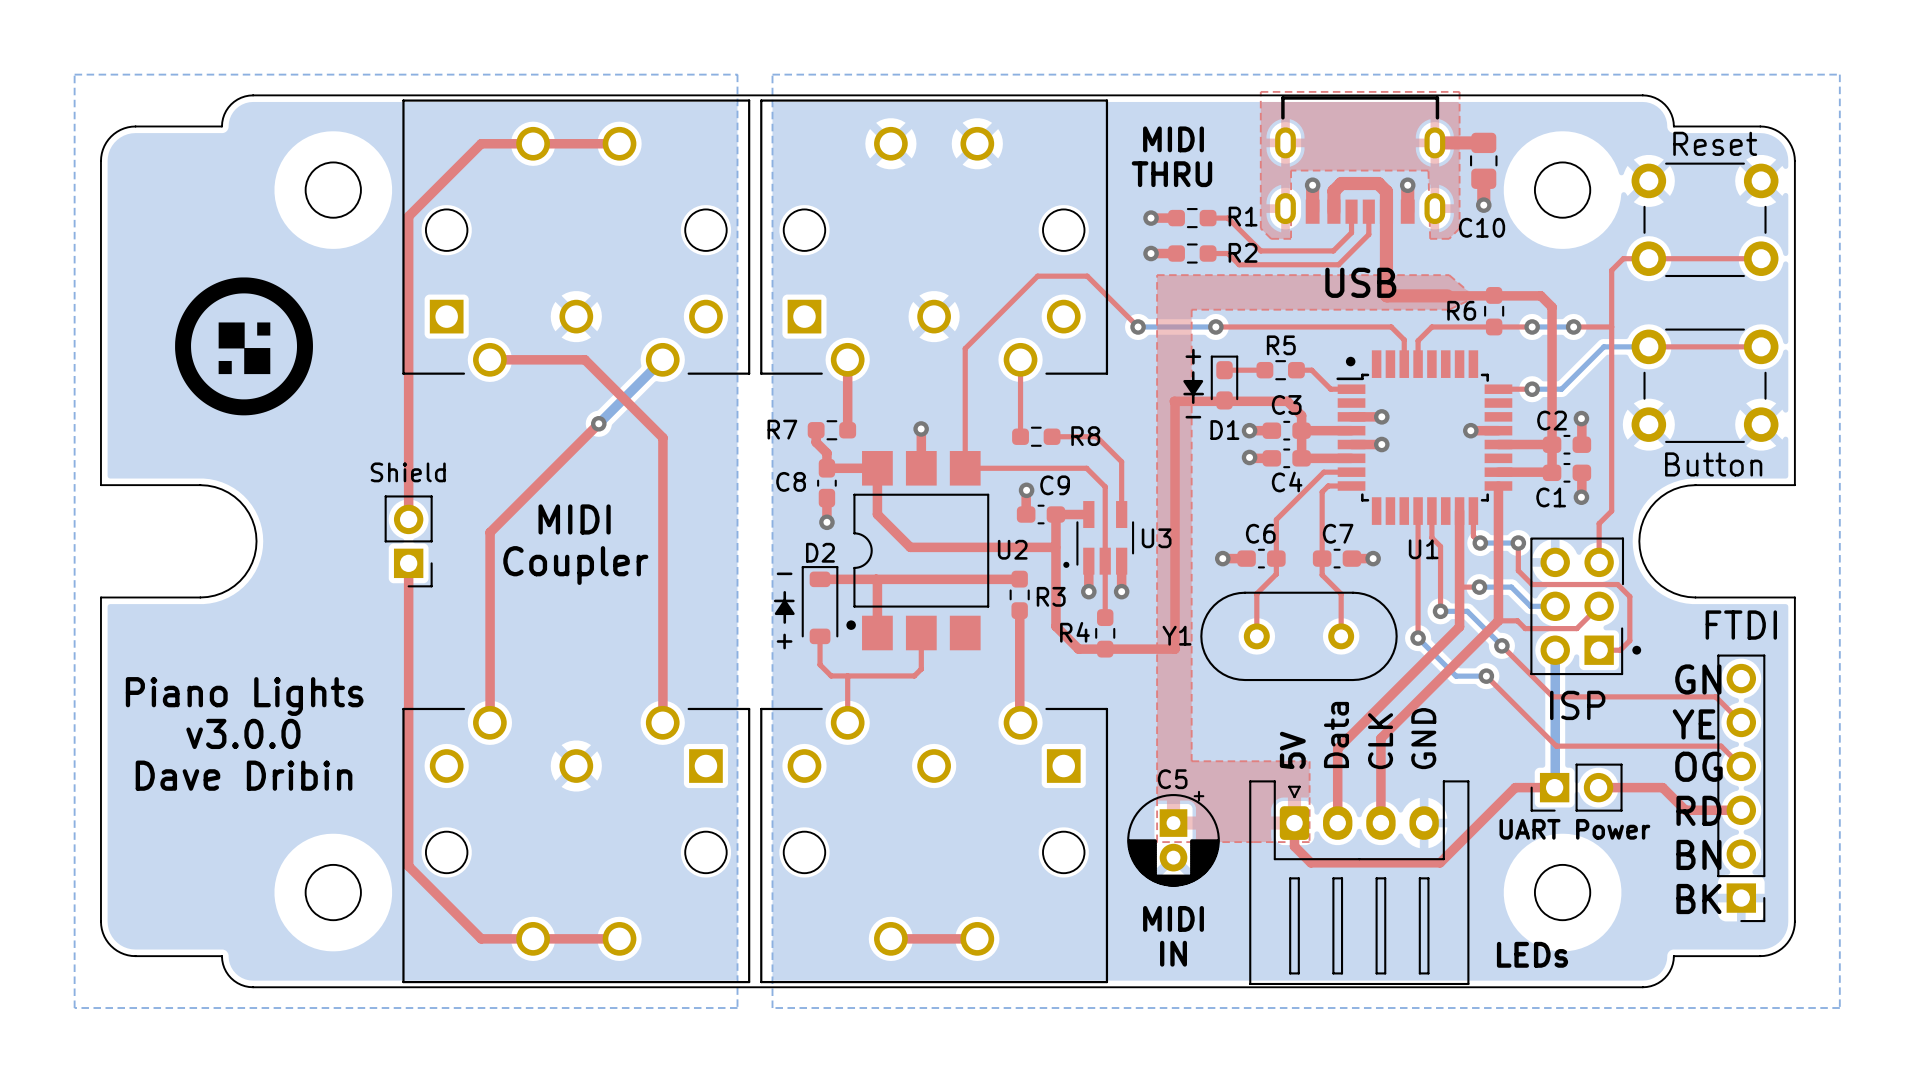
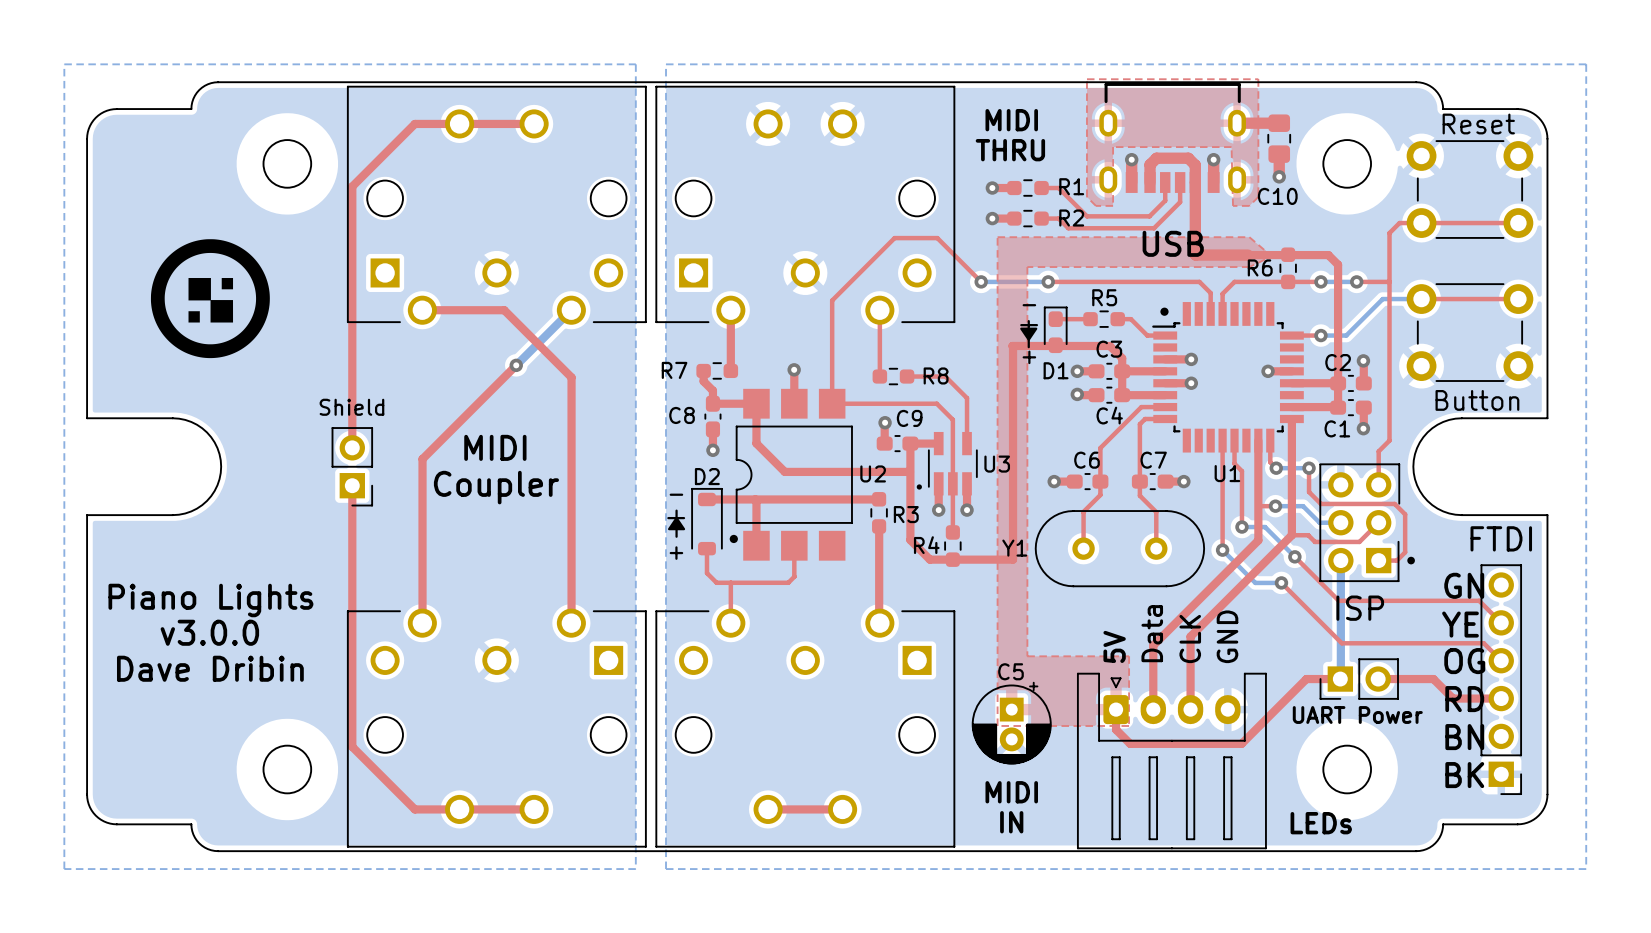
text rotation: 0° (1193, 356) -> 180° (1029, 357)
text position: + (1193, 356) -> + (1029, 357)
line: (1184, 394) (1202, 394) -> (1021, 325) (1036, 325)
text rotation: 0° (1193, 417) -> 180° (1029, 305)
text position: - (1193, 417) -> - (1029, 305)

